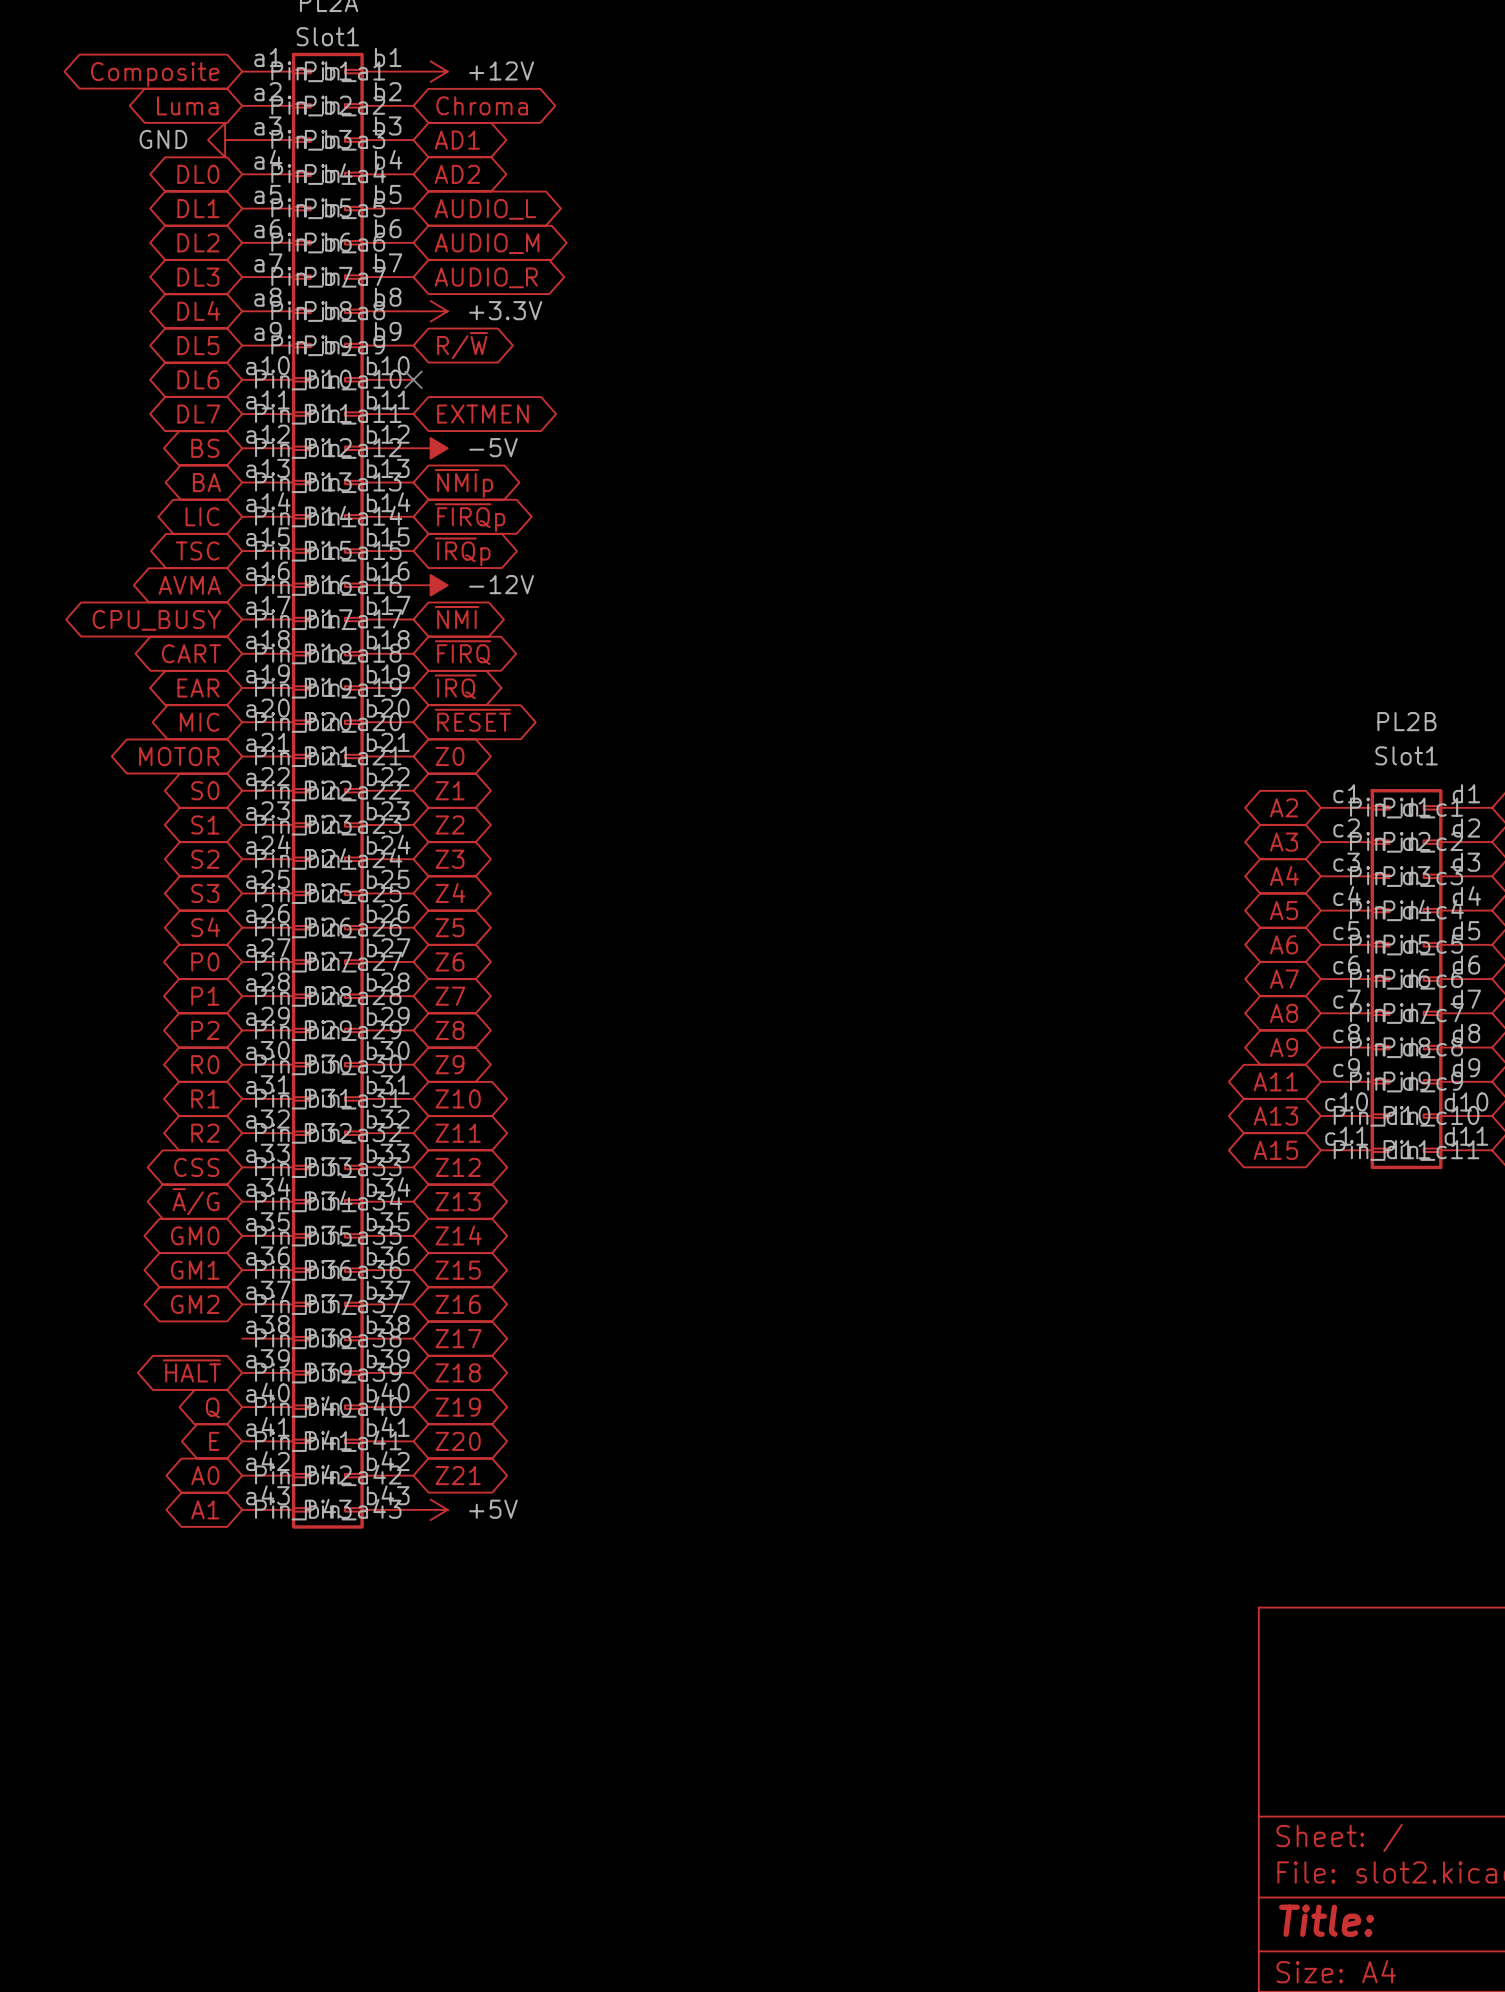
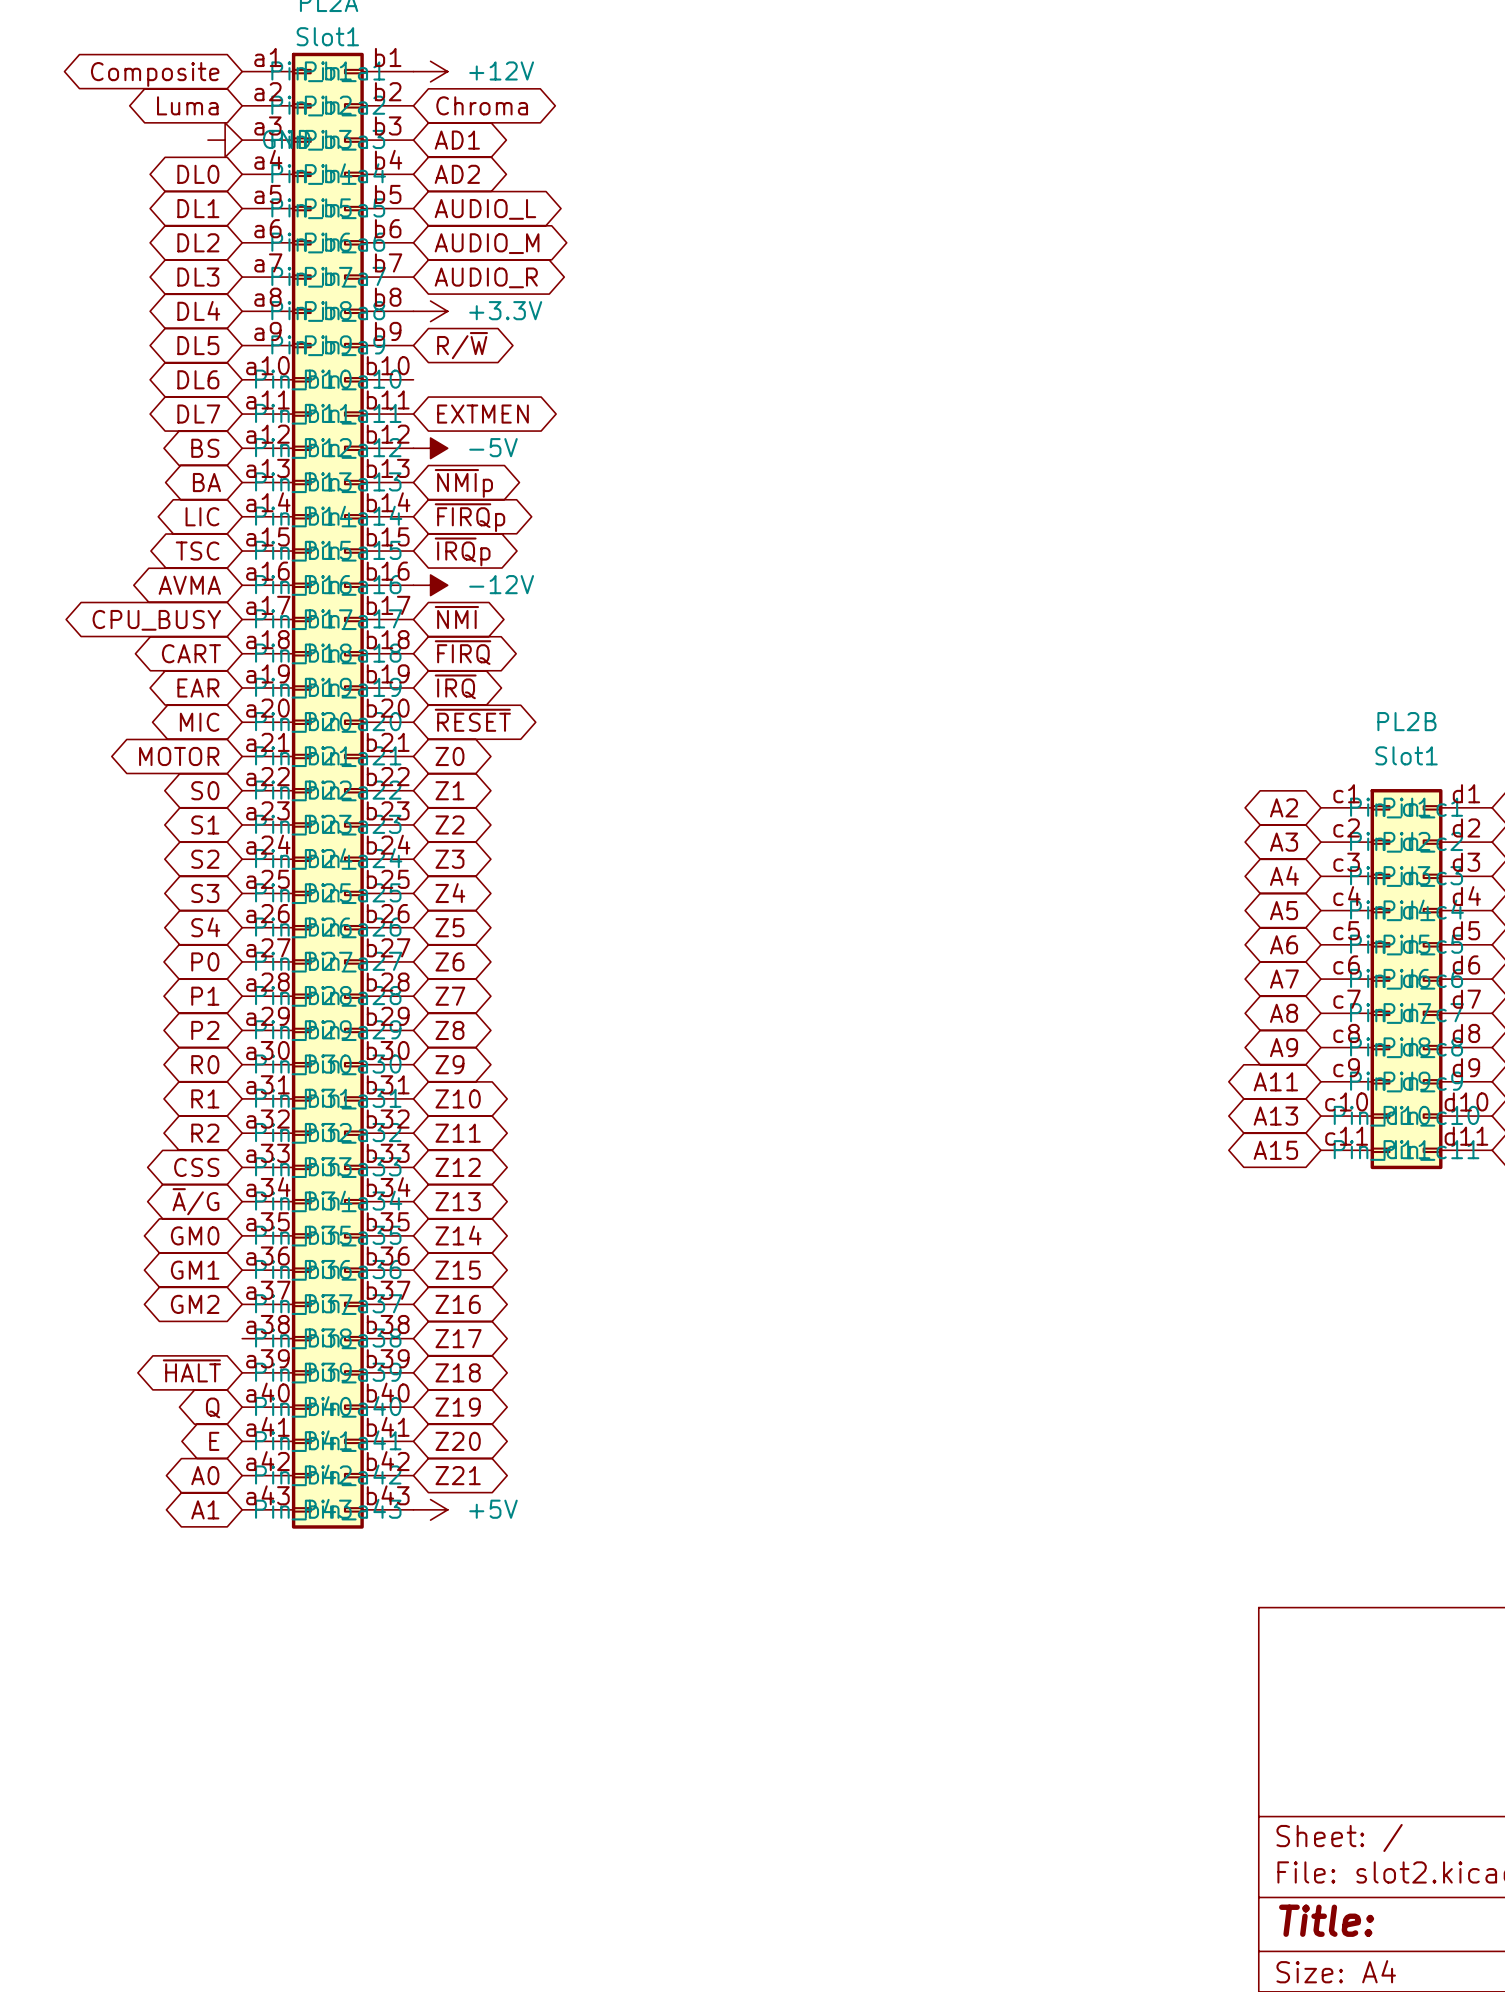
power symbol rotation: 0° (225, 140) -> 180° (225, 140)
no-connect mark: (413, 379) -> none

